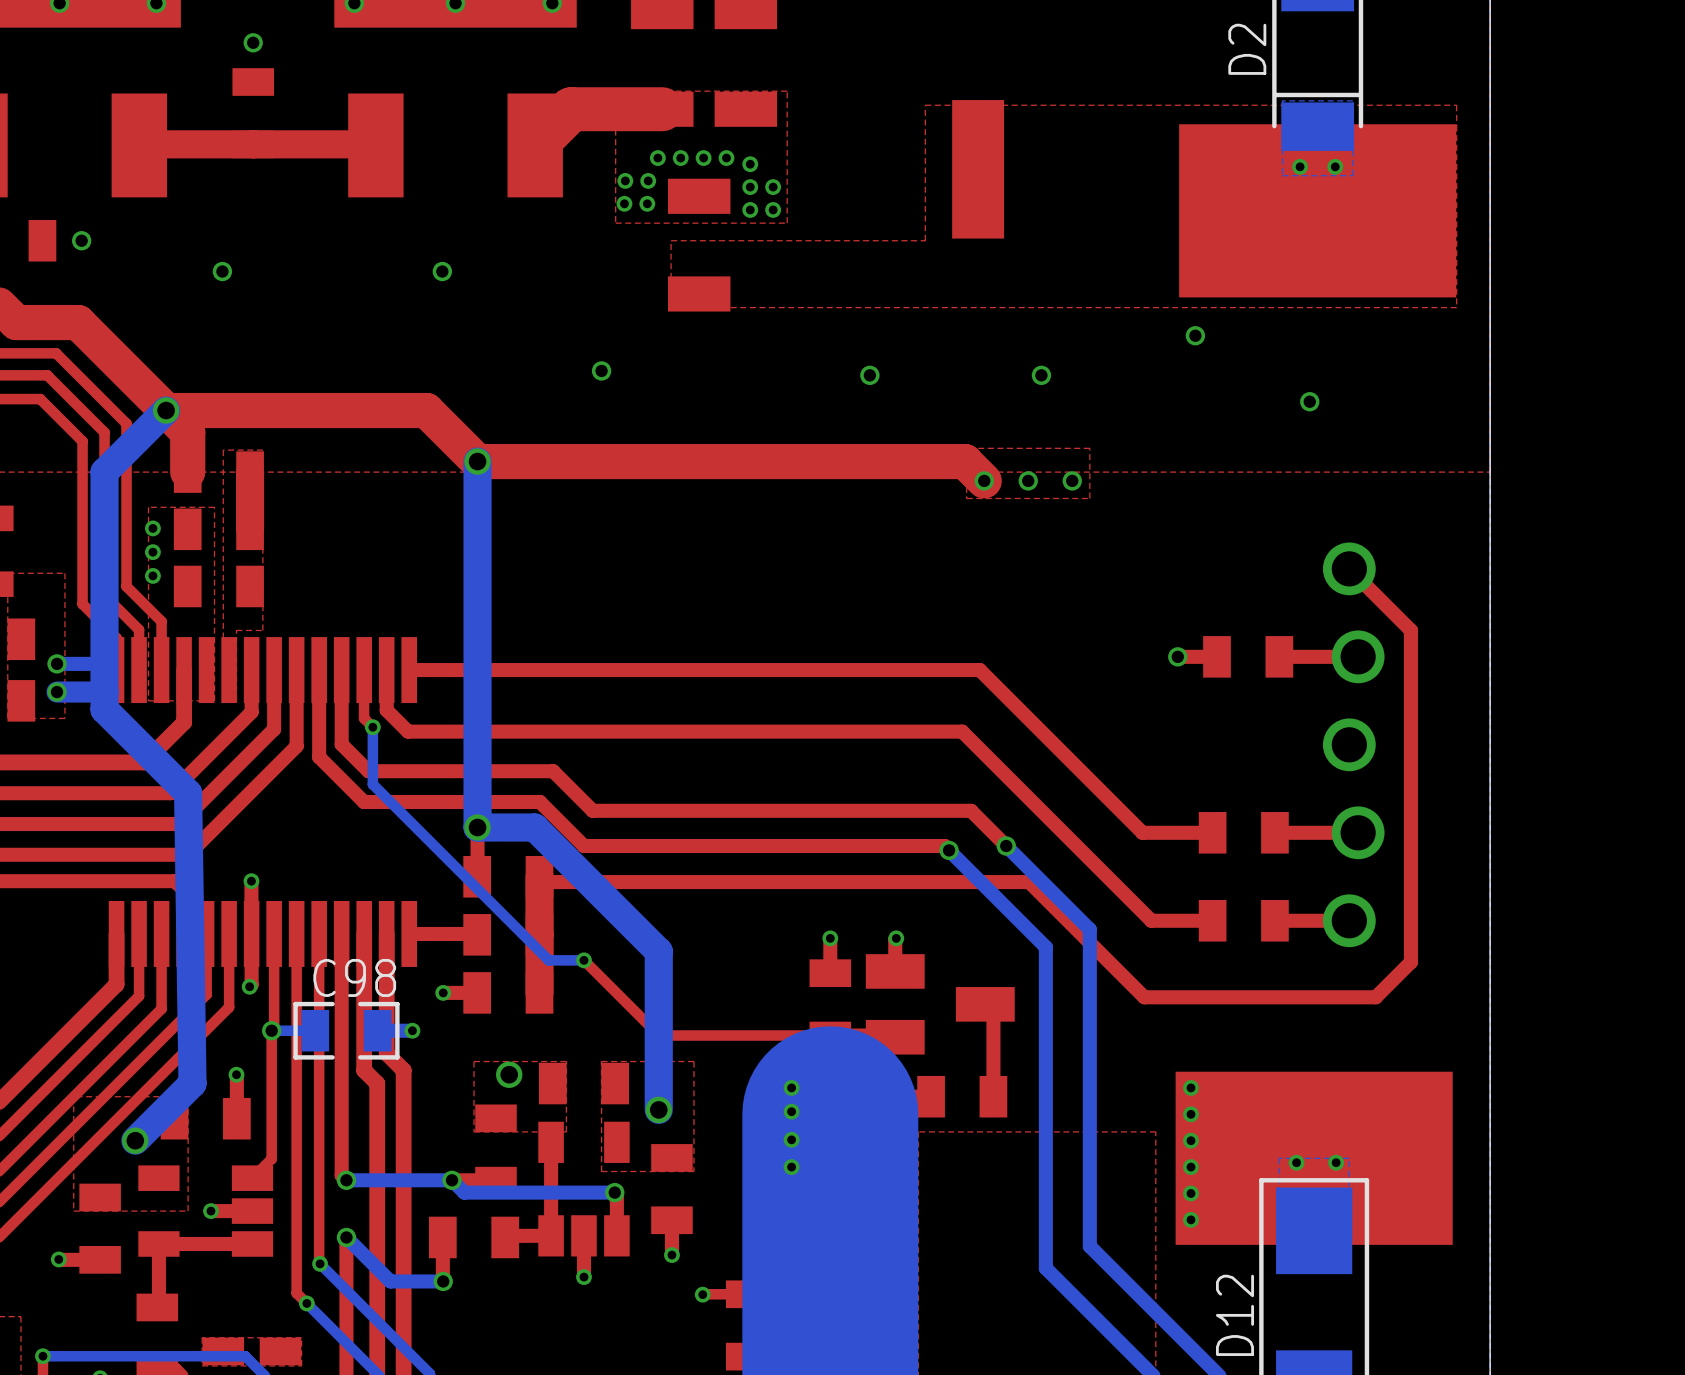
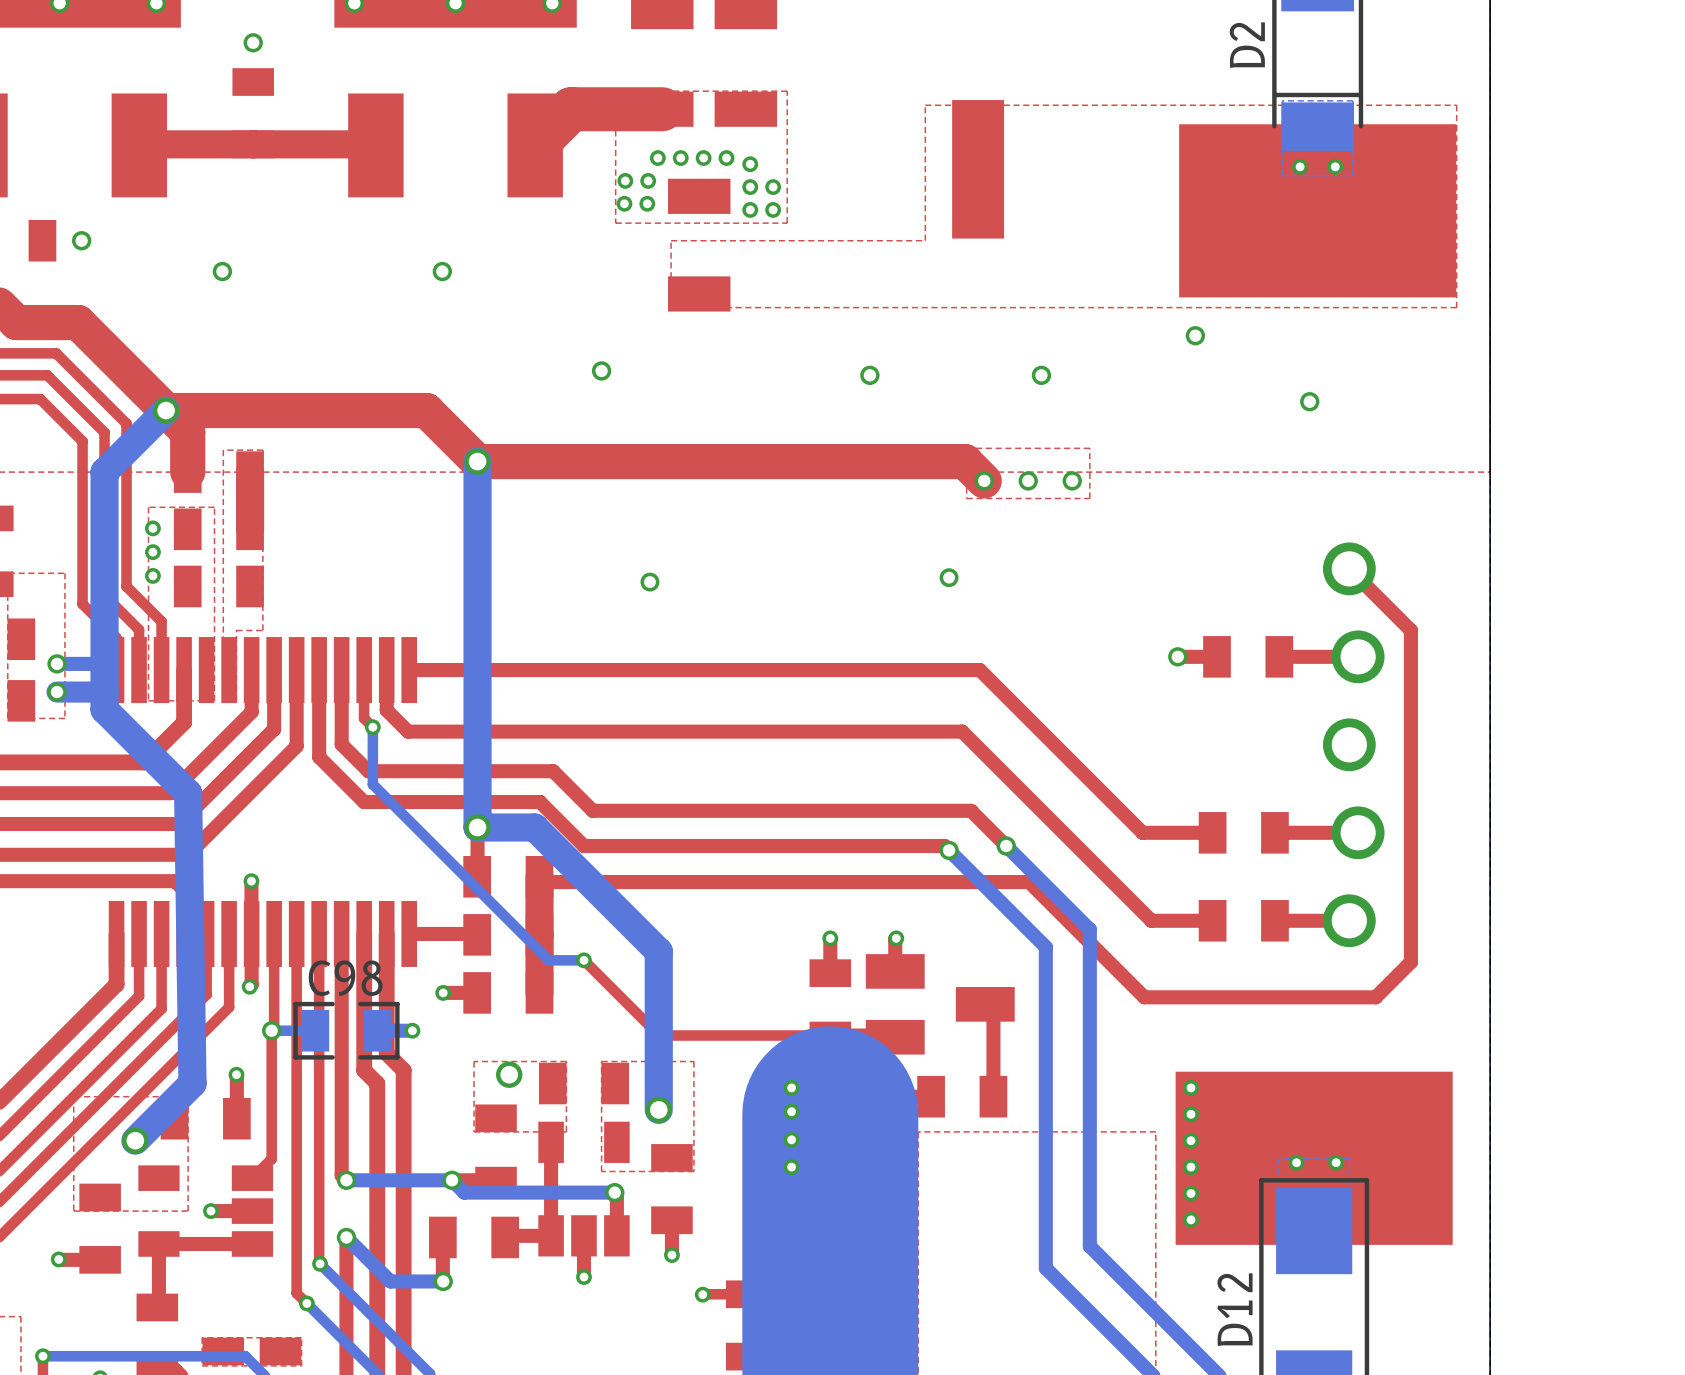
via: none -> (949, 577)
via: none -> (649, 582)

